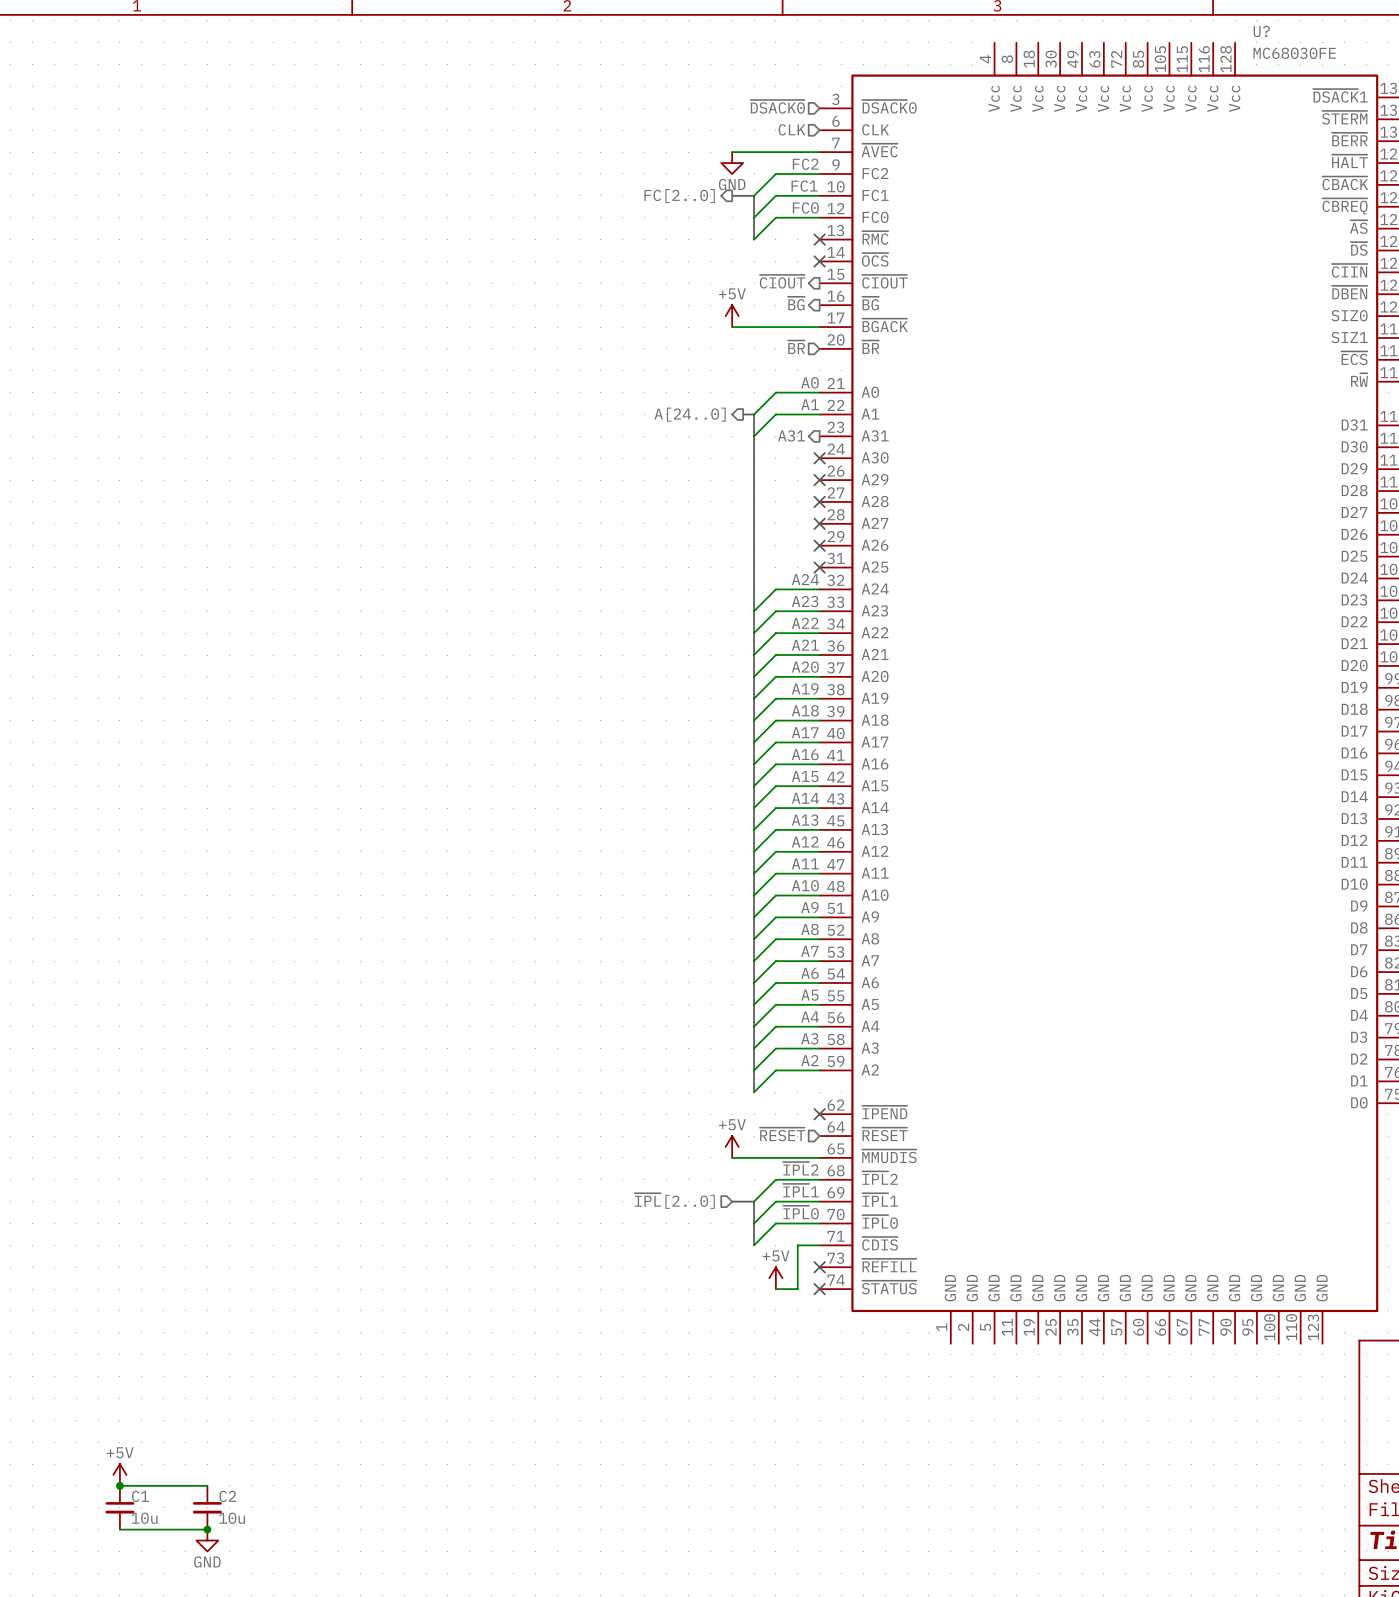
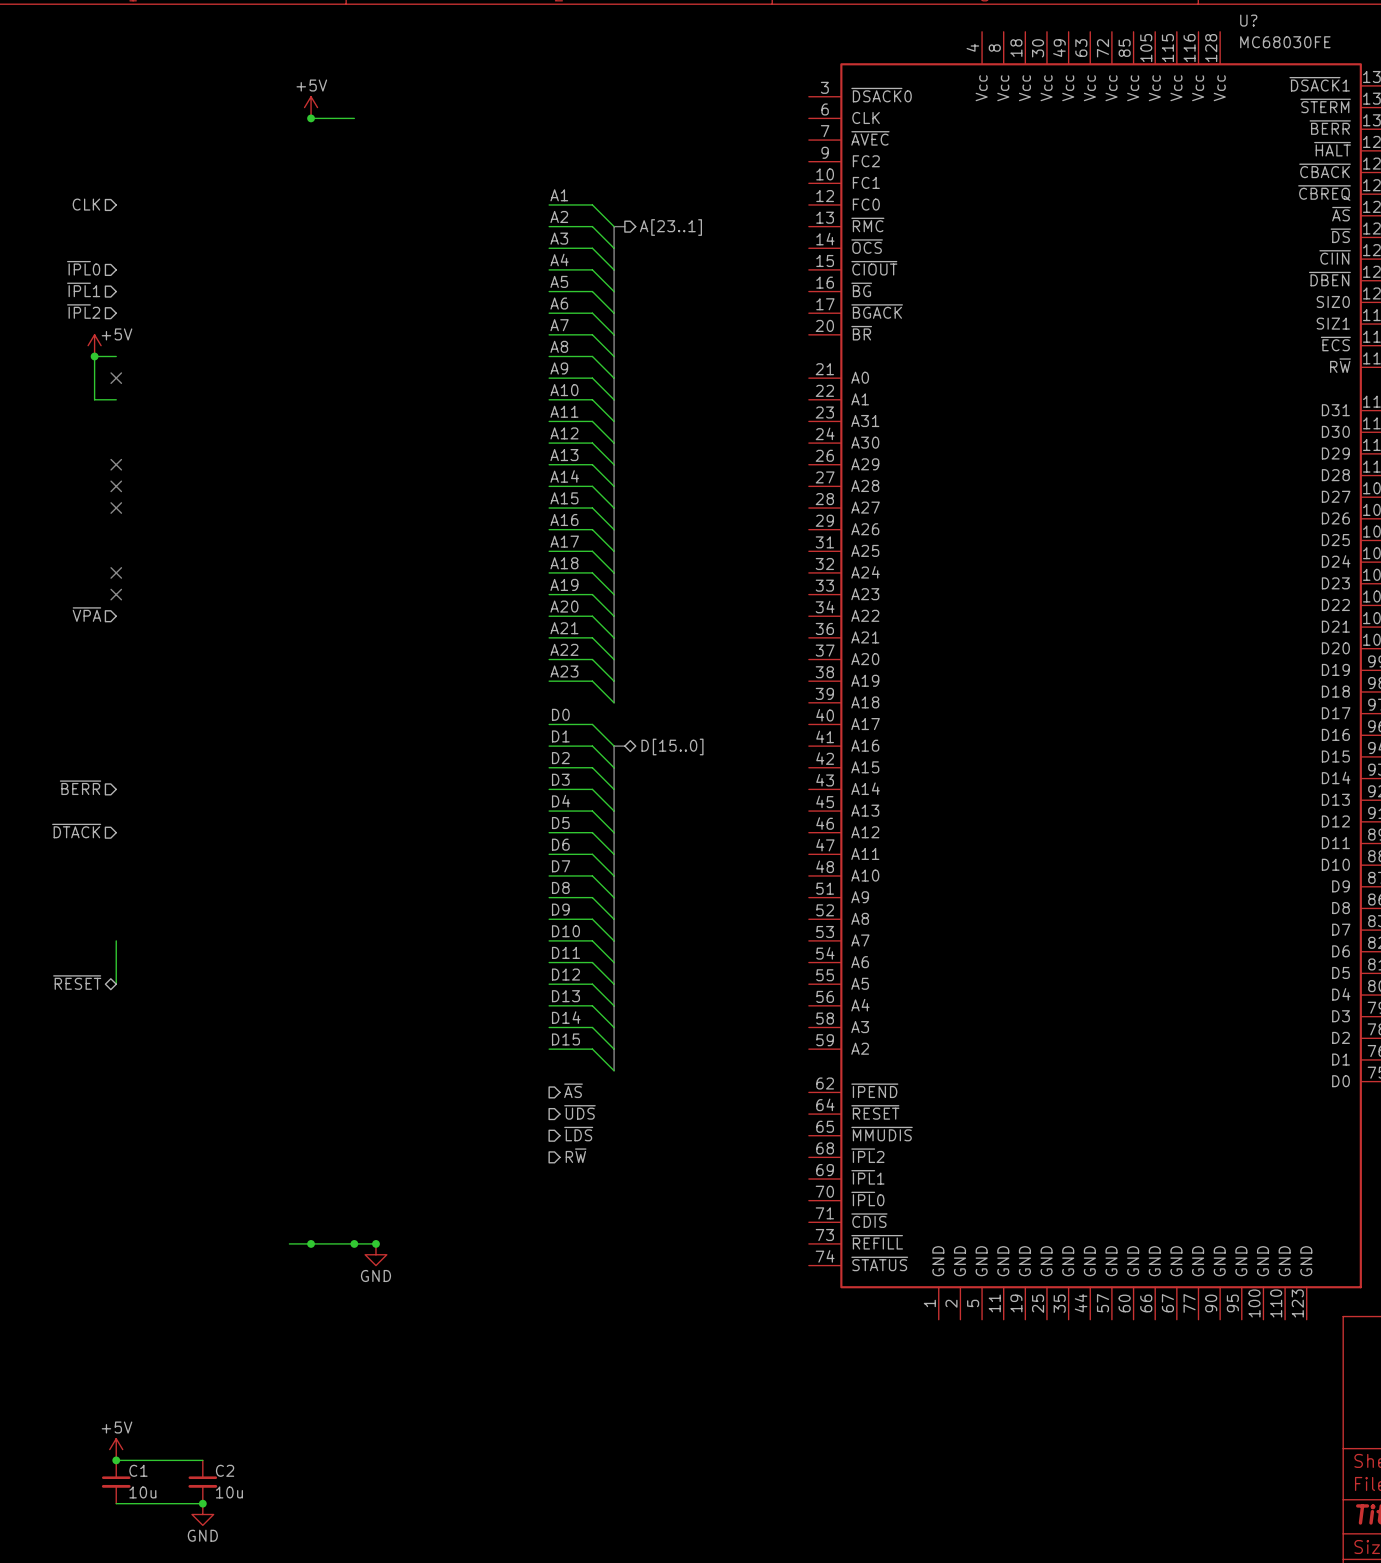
hierarchical label: ~{DSACK0} (777, 106) -> none
power symbol: none -> +5V (311, 107)
hierarchical label: CLK (792, 129) -> none
wire: none -> (311, 118) (354, 118)
junction: none -> (311, 118)
wire: (732, 152) (819, 152) -> none
power symbol: GND (732, 163) -> none
label: FC2 (805, 164) -> none
wire: (819, 173) (775, 173) (754, 195) -> none
label: FC1 (804, 186) -> none
bus: (732, 195) (754, 195) (754, 239) -> none
wire: (819, 195) (775, 195) (754, 217) -> none
hierarchical label: FC[2..0] (679, 196) -> none
label: none -> A1 (559, 195)
label: FC0 (805, 207) -> none
hierarchical label: none -> CLK (86, 204)
wire: none -> (549, 204) (592, 204) (614, 226)
wire: (819, 217) (775, 217) (754, 239) -> none
label: none -> A2 (559, 216)
wire: none -> (549, 226) (592, 226) (614, 248)
bus: none -> (624, 226) (614, 226) (614, 702)
hierarchical label: none -> A[23..1] (670, 227)
no-connect mark: (819, 239) -> none
label: none -> A3 (559, 238)
wire: none -> (549, 248) (592, 248) (614, 269)
no-connect mark: (819, 261) -> none
label: none -> A4 (559, 260)
hierarchical label: none -> ~{IPL}0 (83, 268)
hierarchical label: ~{CIOUT} (782, 281) -> none
wire: none -> (549, 269) (592, 269) (614, 291)
label: none -> A5 (559, 281)
hierarchical label: none -> ~{IPL}1 (83, 289)
hierarchical label: ~{BG} (796, 303) -> none
wire: none -> (549, 291) (592, 291) (614, 313)
power symbol: +5V (732, 316) -> none
label: none -> A6 (559, 303)
hierarchical label: none -> ~{IPL}2 (83, 311)
wire: none -> (549, 313) (592, 313) (614, 334)
wire: (732, 327) (819, 327) -> none
label: none -> A7 (559, 325)
hierarchical label: ~{BR} (796, 347) -> none
wire: none -> (549, 334) (592, 334) (614, 356)
power symbol: none -> +5V (94, 345)
label: none -> A8 (559, 346)
junction: none -> (94, 356)
wire: none -> (116, 356) (94, 356) (94, 399) (116, 399)
wire: none -> (549, 356) (592, 356) (614, 378)
label: none -> A9 (559, 368)
label: A0 (810, 382) -> none
no-connect mark: none -> (116, 378)
wire: none -> (549, 378) (592, 378) (614, 399)
wire: (819, 392) (775, 392) (754, 414) -> none
label: none -> A10 (564, 390)
label: A1 (810, 404) -> none
wire: none -> (549, 399) (592, 399) (614, 421)
hierarchical label: A[24..0] (690, 414) -> none
bus: (743, 414) (754, 414) (754, 1092) -> none
wire: (819, 414) (775, 414) (754, 436) -> none
label: none -> A11 (564, 411)
hierarchical label: A31 (791, 435) -> none
wire: none -> (549, 421) (592, 421) (614, 443)
label: none -> A12 (564, 433)
wire: none -> (549, 443) (592, 443) (614, 464)
no-connect mark: (819, 458) -> none
label: none -> A13 (564, 455)
no-connect mark: none -> (116, 464)
wire: none -> (549, 464) (592, 464) (614, 486)
no-connect mark: (819, 480) -> none
label: none -> A14 (564, 476)
no-connect mark: none -> (116, 486)
wire: none -> (549, 486) (592, 486) (614, 508)
no-connect mark: (819, 501) -> none
label: none -> A15 (564, 498)
no-connect mark: none -> (116, 508)
wire: none -> (549, 508) (592, 508) (614, 529)
no-connect mark: (819, 523) -> none
label: none -> A16 (564, 519)
wire: none -> (549, 529) (592, 529) (614, 551)
no-connect mark: (819, 545) -> none
label: none -> A17 (564, 541)
wire: none -> (549, 551) (592, 551) (614, 572)
no-connect mark: (819, 567) -> none
label: none -> A18 (564, 563)
label: A24 (805, 579) -> none
no-connect mark: none -> (116, 572)
wire: none -> (549, 572) (592, 572) (614, 594)
wire: (819, 589) (775, 589) (754, 611) -> none
label: none -> A19 (564, 584)
label: A23 (805, 601) -> none
no-connect mark: none -> (116, 594)
wire: none -> (549, 594) (592, 594) (614, 616)
wire: (819, 611) (775, 611) (754, 633) -> none
label: none -> A20 (564, 606)
label: A22 (805, 623) -> none
hierarchical label: none -> ~{VPA} (86, 614)
wire: none -> (549, 616) (592, 616) (614, 637)
wire: (819, 633) (775, 633) (754, 655) -> none
label: none -> A21 (564, 628)
label: A21 (805, 645) -> none
wire: none -> (549, 637) (592, 637) (614, 659)
wire: (819, 655) (775, 655) (754, 676) -> none
label: none -> A22 (564, 649)
label: A20 (805, 667) -> none
wire: none -> (549, 659) (592, 659) (614, 681)
wire: (819, 676) (775, 676) (754, 698) -> none
label: none -> A23 (564, 671)
label: A19 (805, 688) -> none
wire: none -> (549, 681) (592, 681) (614, 702)
wire: (819, 698) (775, 698) (754, 720) -> none
label: A18 (805, 710) -> none
wire: (819, 720) (775, 720) (754, 742) -> none
label: none -> D0 (560, 714)
label: A17 (805, 732) -> none
wire: none -> (549, 724) (592, 724) (614, 746)
wire: (819, 742) (775, 742) (754, 764) -> none
label: none -> D1 (560, 736)
label: A16 (805, 754) -> none
wire: none -> (549, 746) (592, 746) (614, 767)
bus: none -> (624, 746) (614, 746) (614, 1070)
hierarchical label: none -> D[15..0] (672, 746)
wire: (819, 764) (775, 764) (754, 786) -> none
label: none -> D2 (560, 758)
label: A15 (805, 776) -> none
wire: none -> (549, 767) (592, 767) (614, 789)
wire: (819, 786) (775, 786) (754, 808) -> none
label: none -> D3 (560, 779)
label: A14 (805, 798) -> none
hierarchical label: none -> ~{BERR} (80, 787)
wire: none -> (549, 789) (592, 789) (614, 811)
wire: (819, 808) (775, 808) (754, 829) -> none
label: none -> D4 (561, 801)
label: A13 (805, 820) -> none
wire: none -> (549, 811) (592, 811) (614, 832)
wire: (819, 829) (775, 829) (754, 851) -> none
label: A12 (805, 841) -> none
label: none -> D5 (560, 823)
hierarchical label: none -> ~{DTACK} (76, 831)
wire: none -> (549, 832) (592, 832) (614, 854)
wire: (819, 851) (775, 851) (754, 873) -> none
label: A11 (805, 863) -> none
label: none -> D6 (560, 844)
wire: none -> (549, 854) (592, 854) (614, 875)
wire: (819, 873) (775, 873) (754, 895) -> none
label: none -> D7 (561, 866)
label: A10 (805, 885) -> none
wire: none -> (549, 875) (592, 875) (614, 897)
wire: (819, 895) (775, 895) (754, 917) -> none
label: none -> D8 (560, 887)
label: A9 (809, 907) -> none
wire: none -> (549, 897) (592, 897) (614, 919)
wire: (819, 917) (775, 917) (754, 939) -> none
label: none -> D9 (560, 909)
label: A8 (810, 929) -> none
wire: none -> (549, 919) (592, 919) (614, 940)
wire: (819, 939) (775, 939) (754, 961) -> none
label: none -> D10 (565, 931)
label: A7 (809, 951) -> none
wire: none -> (116, 940) (116, 984)
wire: none -> (549, 940) (592, 940) (614, 962)
wire: (819, 961) (775, 961) (754, 982) -> none
label: none -> D11 (565, 952)
label: A6 (809, 973) -> none
wire: none -> (549, 962) (592, 962) (614, 984)
wire: (819, 982) (775, 982) (754, 1004) -> none
label: none -> D12 (565, 974)
label: A5 (809, 995) -> none
hierarchical label: none -> ~{RESET} (77, 982)
wire: none -> (549, 984) (592, 984) (614, 1005)
wire: (819, 1004) (775, 1004) (754, 1026) -> none
label: none -> D13 (565, 996)
label: A4 (810, 1016) -> none
wire: none -> (549, 1005) (592, 1005) (614, 1027)
wire: (819, 1026) (775, 1026) (754, 1048) -> none
label: none -> D14 (566, 1017)
label: A3 (809, 1038) -> none
wire: none -> (549, 1027) (592, 1027) (614, 1049)
wire: (819, 1048) (775, 1048) (754, 1070) -> none
label: none -> D15 (565, 1039)
label: A2 (809, 1060) -> none
wire: none -> (549, 1049) (592, 1049) (614, 1070)
wire: (819, 1070) (775, 1070) (754, 1092) -> none
hierarchical label: none -> ~{AS} (573, 1090)
no-connect mark: (819, 1114) -> none
hierarchical label: none -> ~{UDS} (579, 1112)
hierarchical label: ~{RESET} (782, 1134) -> none
power symbol: +5V (732, 1146) -> none
hierarchical label: none -> ~{LDS} (578, 1134)
wire: (732, 1157) (819, 1157) -> none
label: ~{IPL}2 (800, 1168) -> none
hierarchical label: none -> R~{W} (576, 1155)
wire: (819, 1179) (775, 1179) (754, 1201) -> none
label: ~{IPL}1 (801, 1190) -> none
hierarchical label: ~{IPL}[2..0] (674, 1201) -> none
bus: (732, 1201) (754, 1201) (754, 1245) -> none
wire: (819, 1201) (775, 1201) (754, 1223) -> none
label: ~{IPL}0 (800, 1212) -> none
wire: (819, 1223) (775, 1223) (754, 1245) -> none
wire: (819, 1245) (797, 1245) (797, 1289) (775, 1289) -> none
wire: none -> (289, 1243) (375, 1243)
junction: none -> (311, 1243)
junction: none -> (354, 1243)
junction: none -> (375, 1243)
no-connect mark: (819, 1267) -> none
power symbol: none -> GND (375, 1254)
power symbol: +5V (775, 1278) -> none
no-connect mark: (819, 1289) -> none

